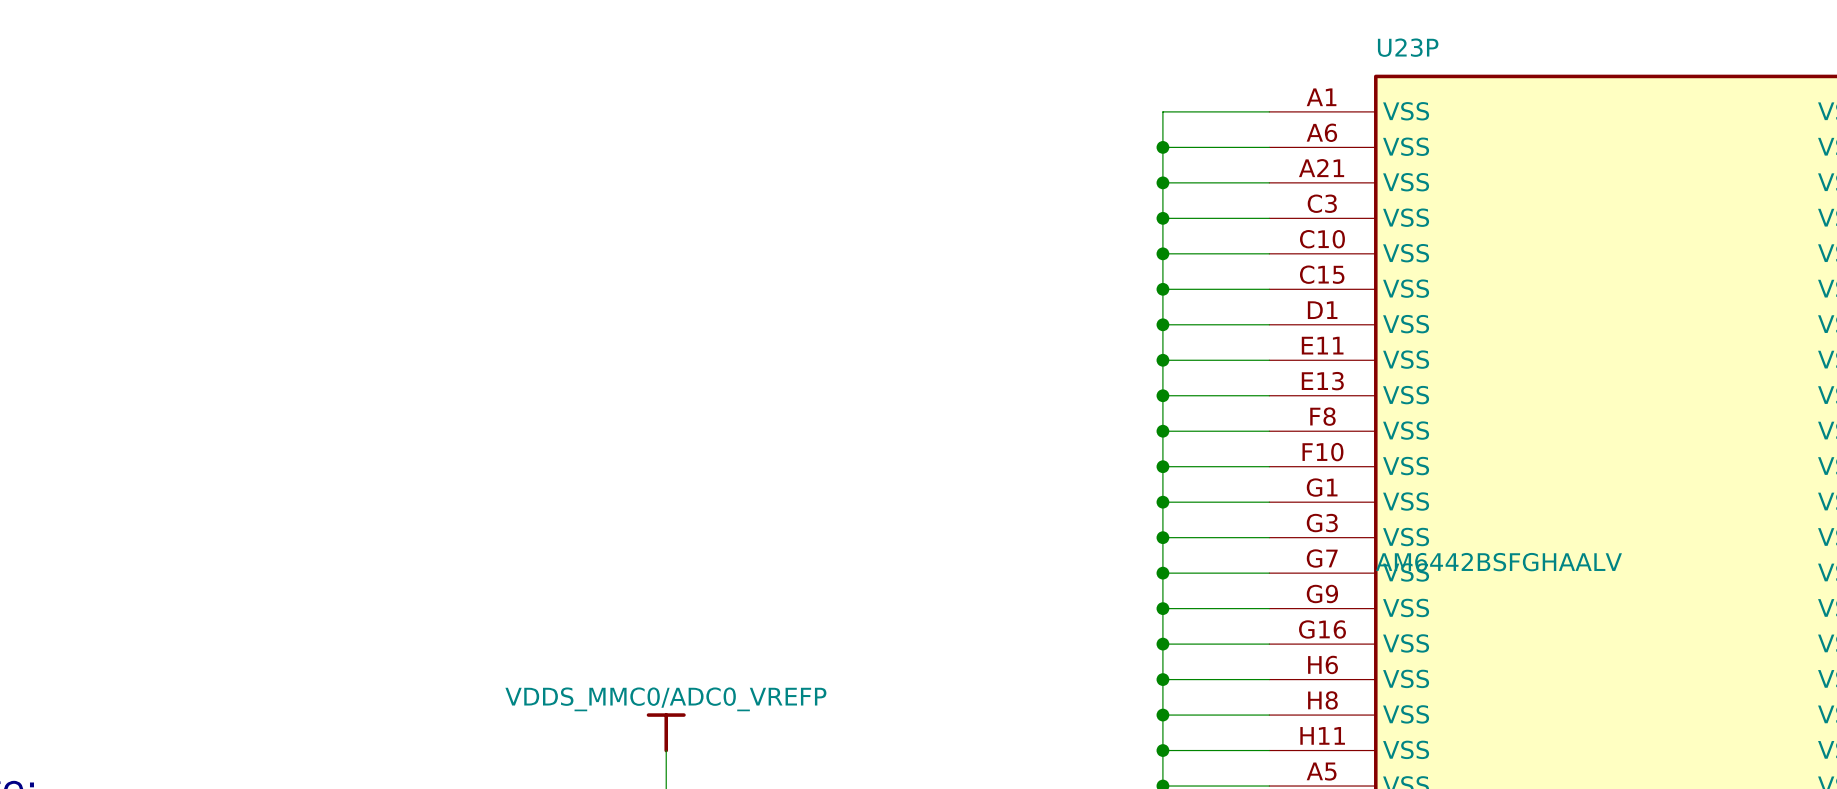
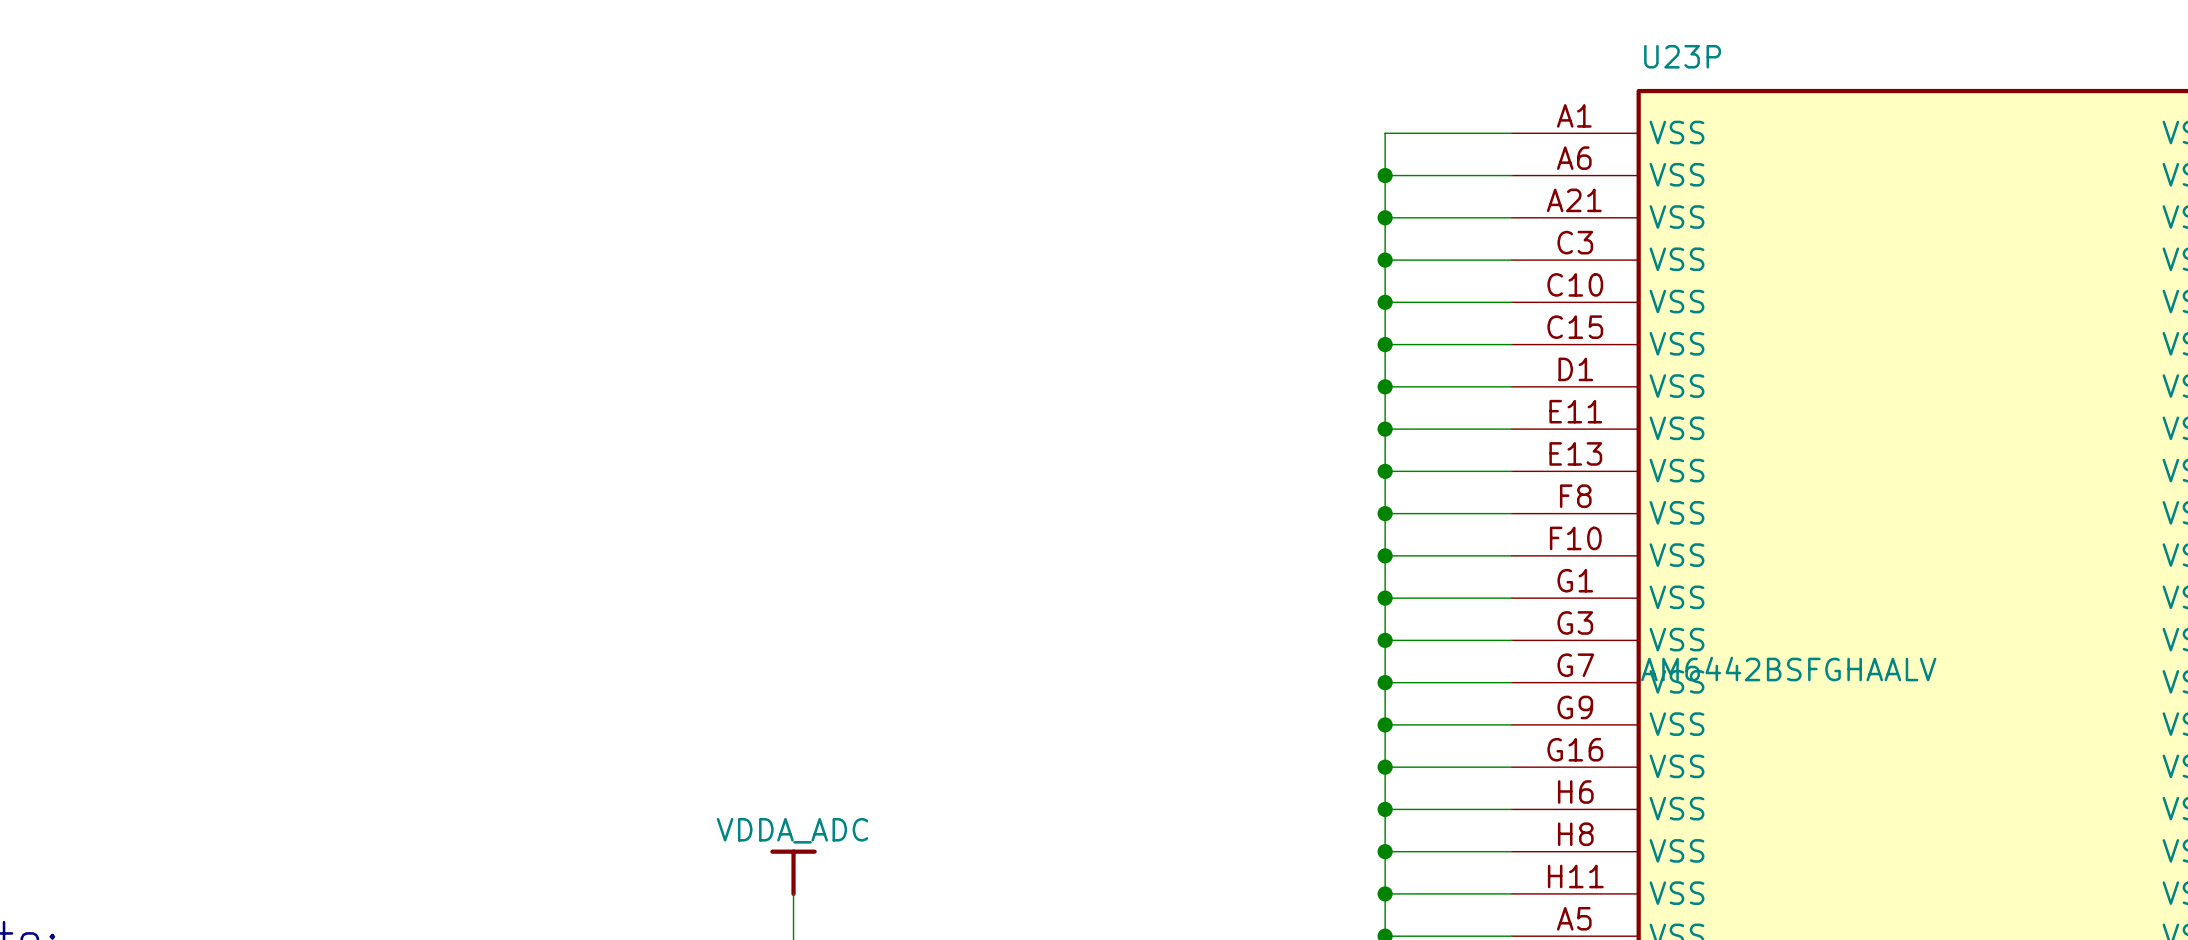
power symbol: VDDS_MMC0/ADC0_VREFP (666, 732) -> VDDA_ADC (793, 872)

